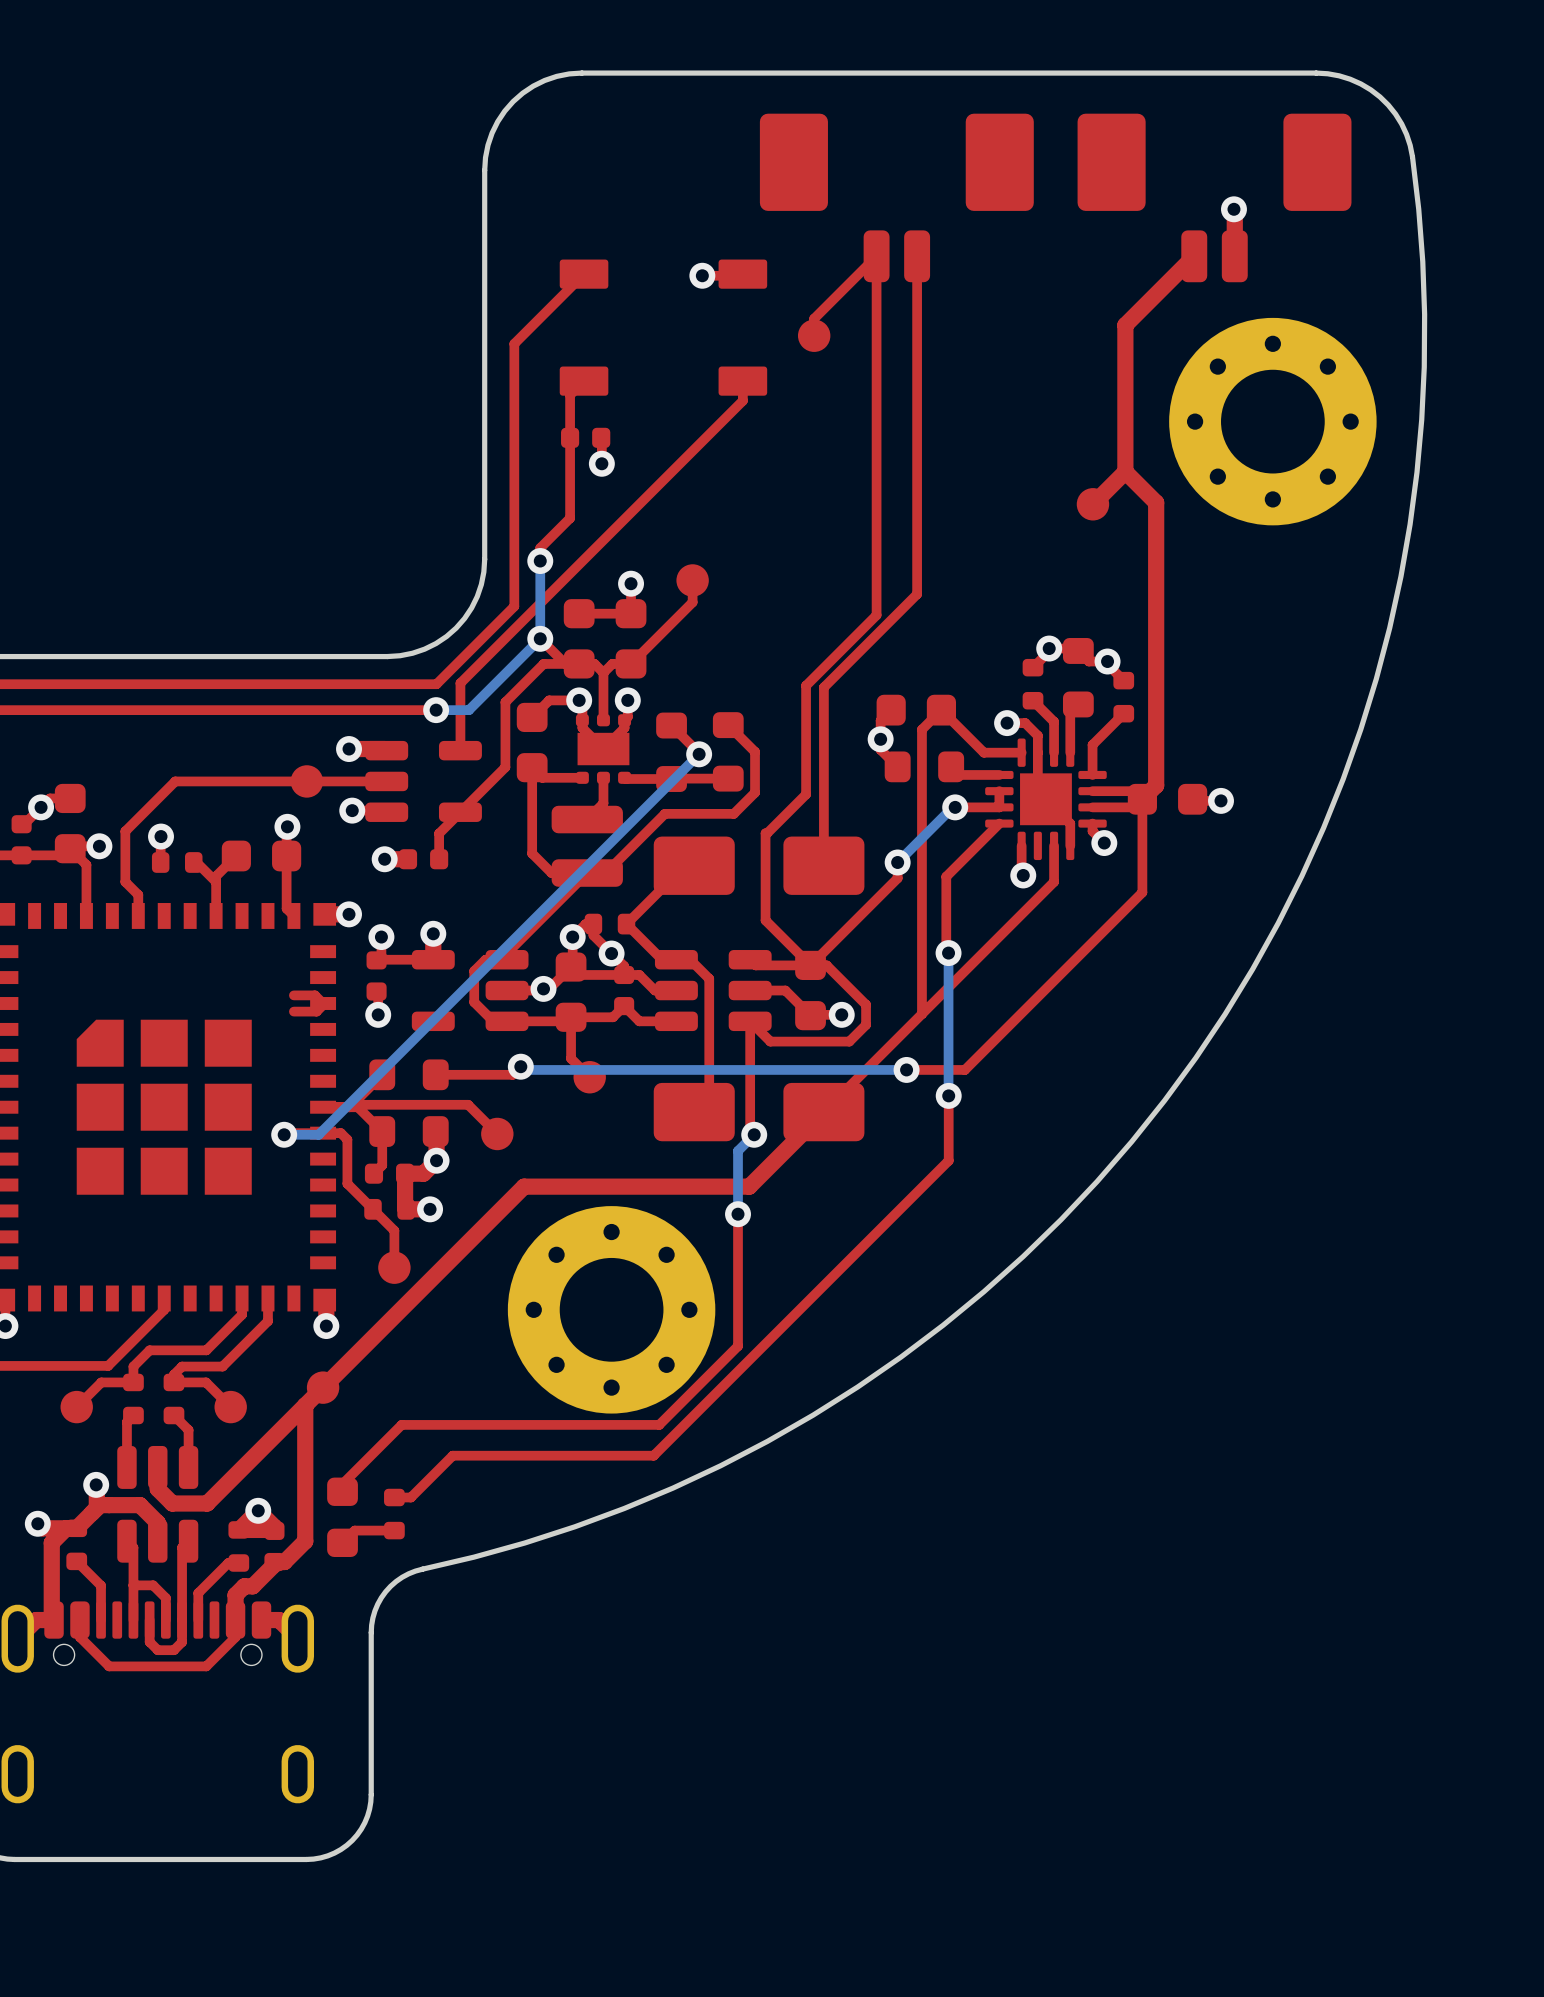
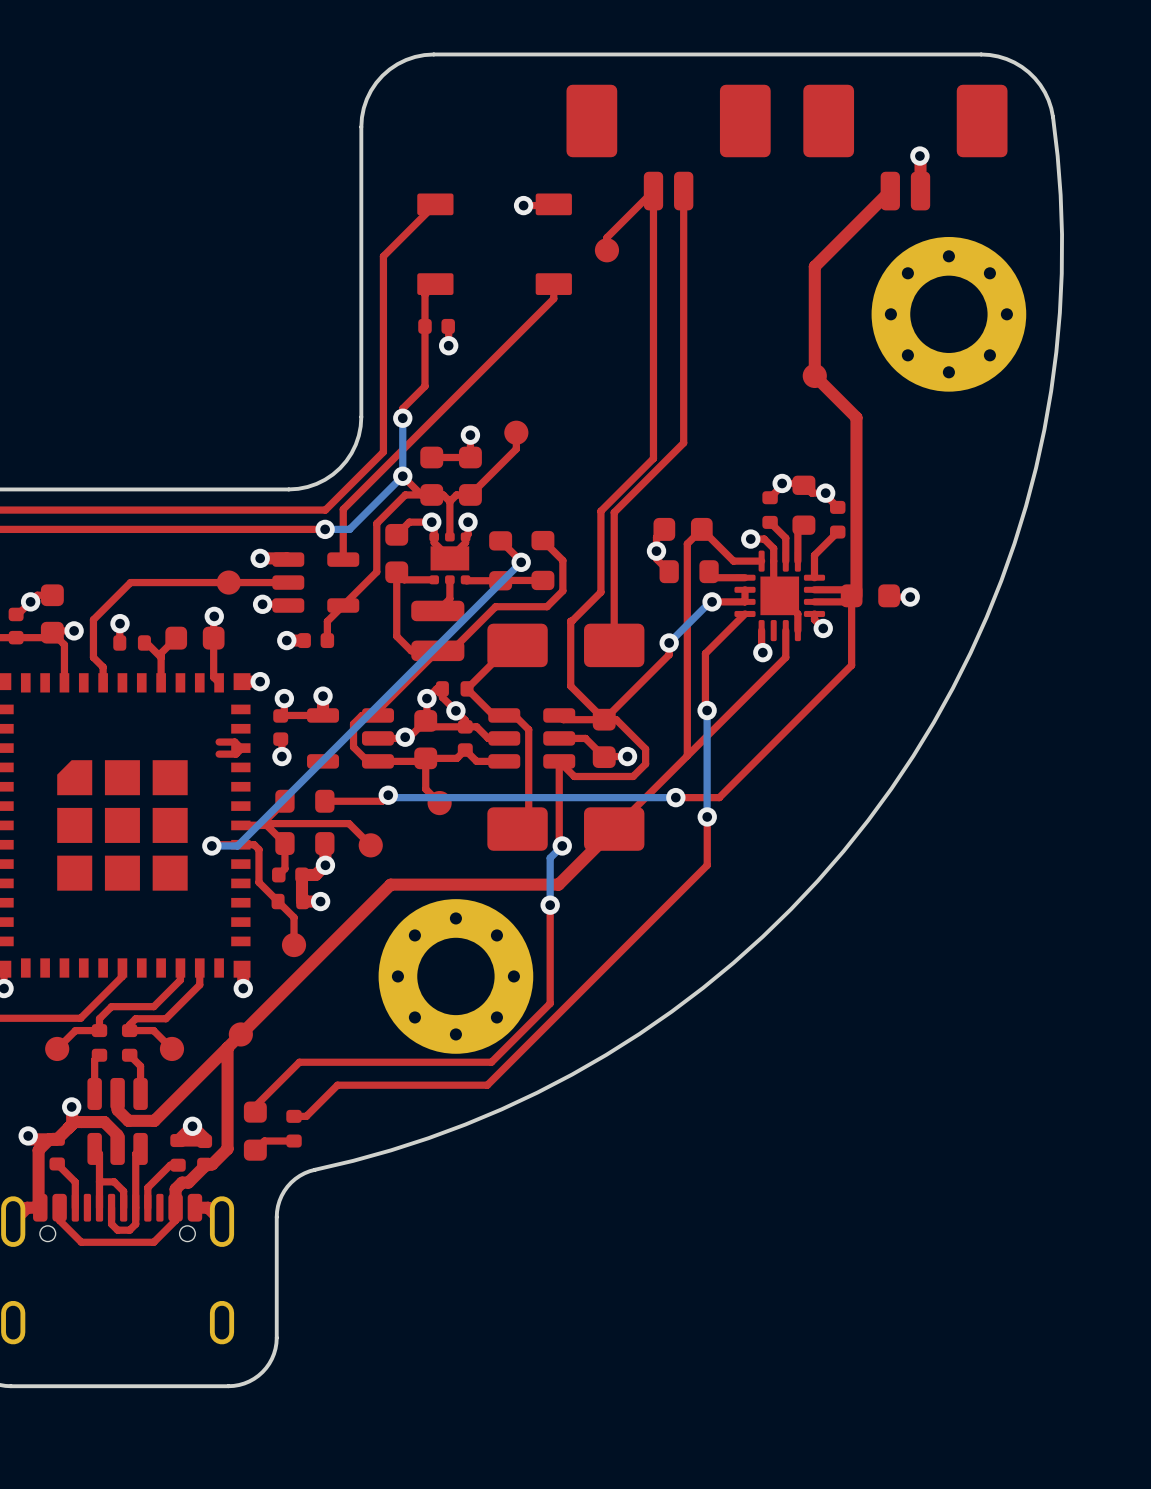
top track: (1125, 325) (1125, 471) -> (838, 242) (814, 266) (814, 375) (856, 417) (856, 595)
top track: (1125, 471) (1156, 502) (1156, 785) (1142, 799) -> none
top track: (1125, 471) (1092, 504) -> none

